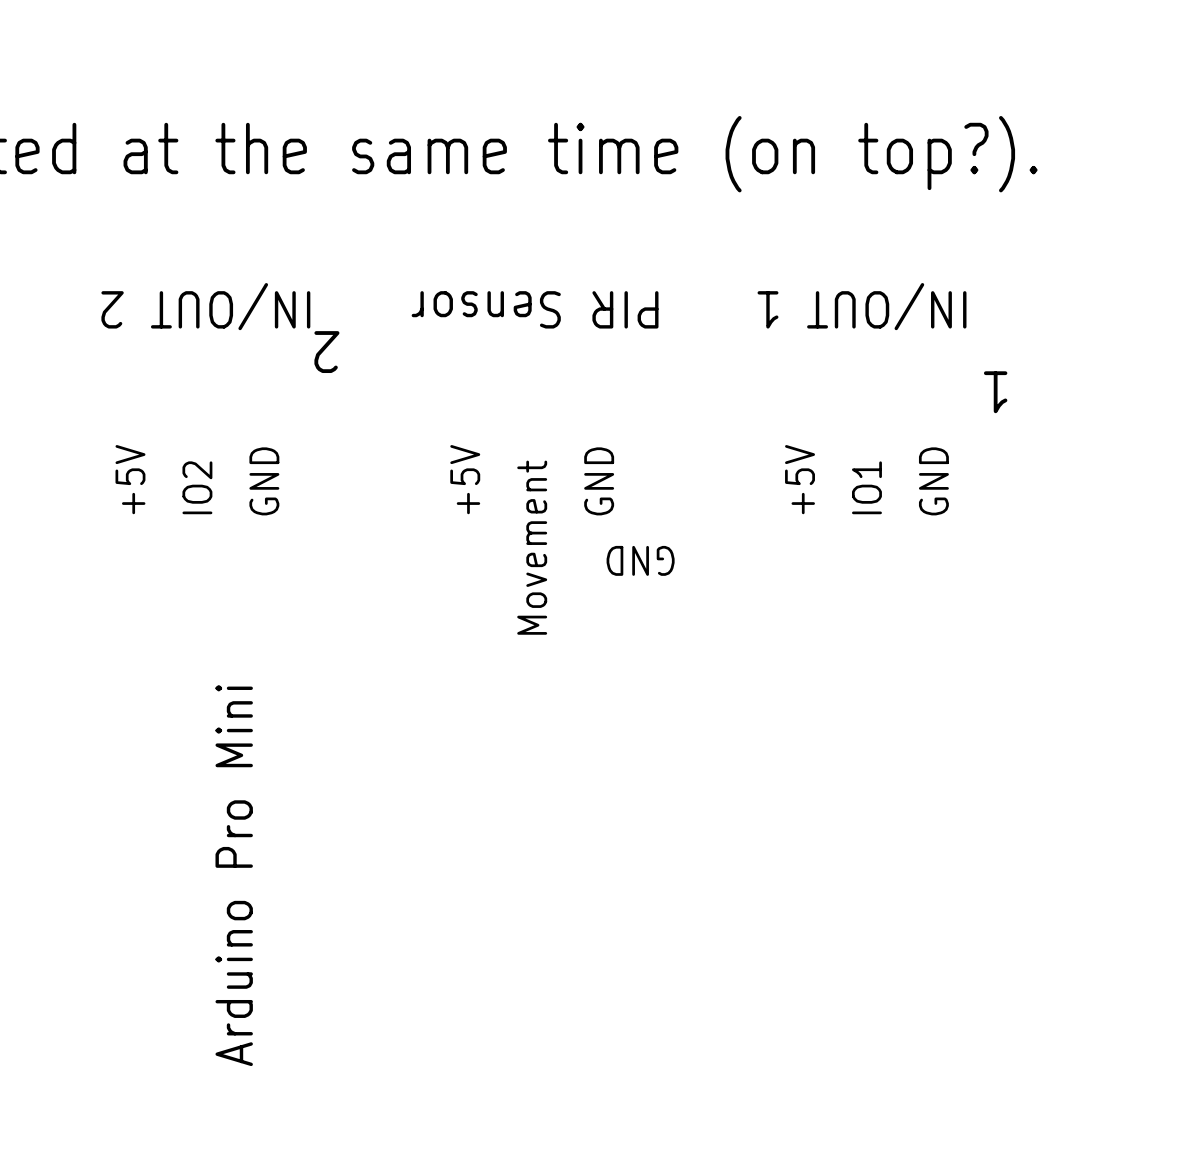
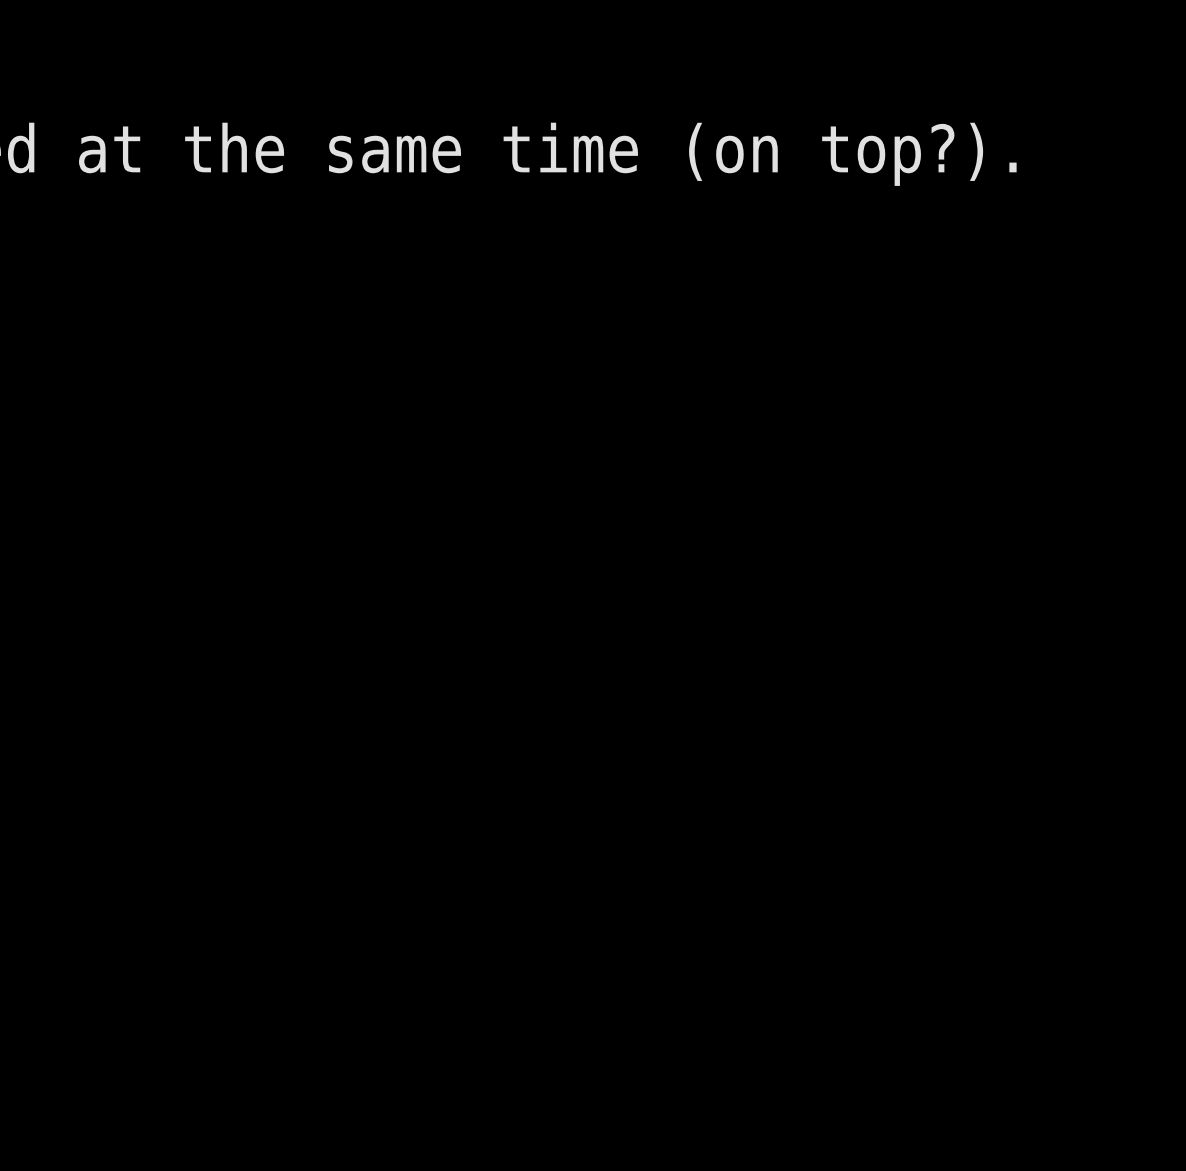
text: IN/OUT 2 (205, 306) -> none
text: IN/OUT 1 (862, 306) -> none
text: PIR Sensor (535, 309) -> none
text: 2 (326, 352) -> none
text: 1 (995, 392) -> none
text: +5V (130, 479) -> none
text: +5V (465, 479) -> none
text: +5V (800, 479) -> none
text: GND (264, 481) -> none
text: GND (599, 481) -> none
text: GND (933, 481) -> none
text: IO2 (197, 487) -> none
text: IO1 (866, 487) -> none
text: Movement (532, 547) -> none
text: GND (640, 560) -> none
text: Arduino Pro Mini (234, 875) -> none

